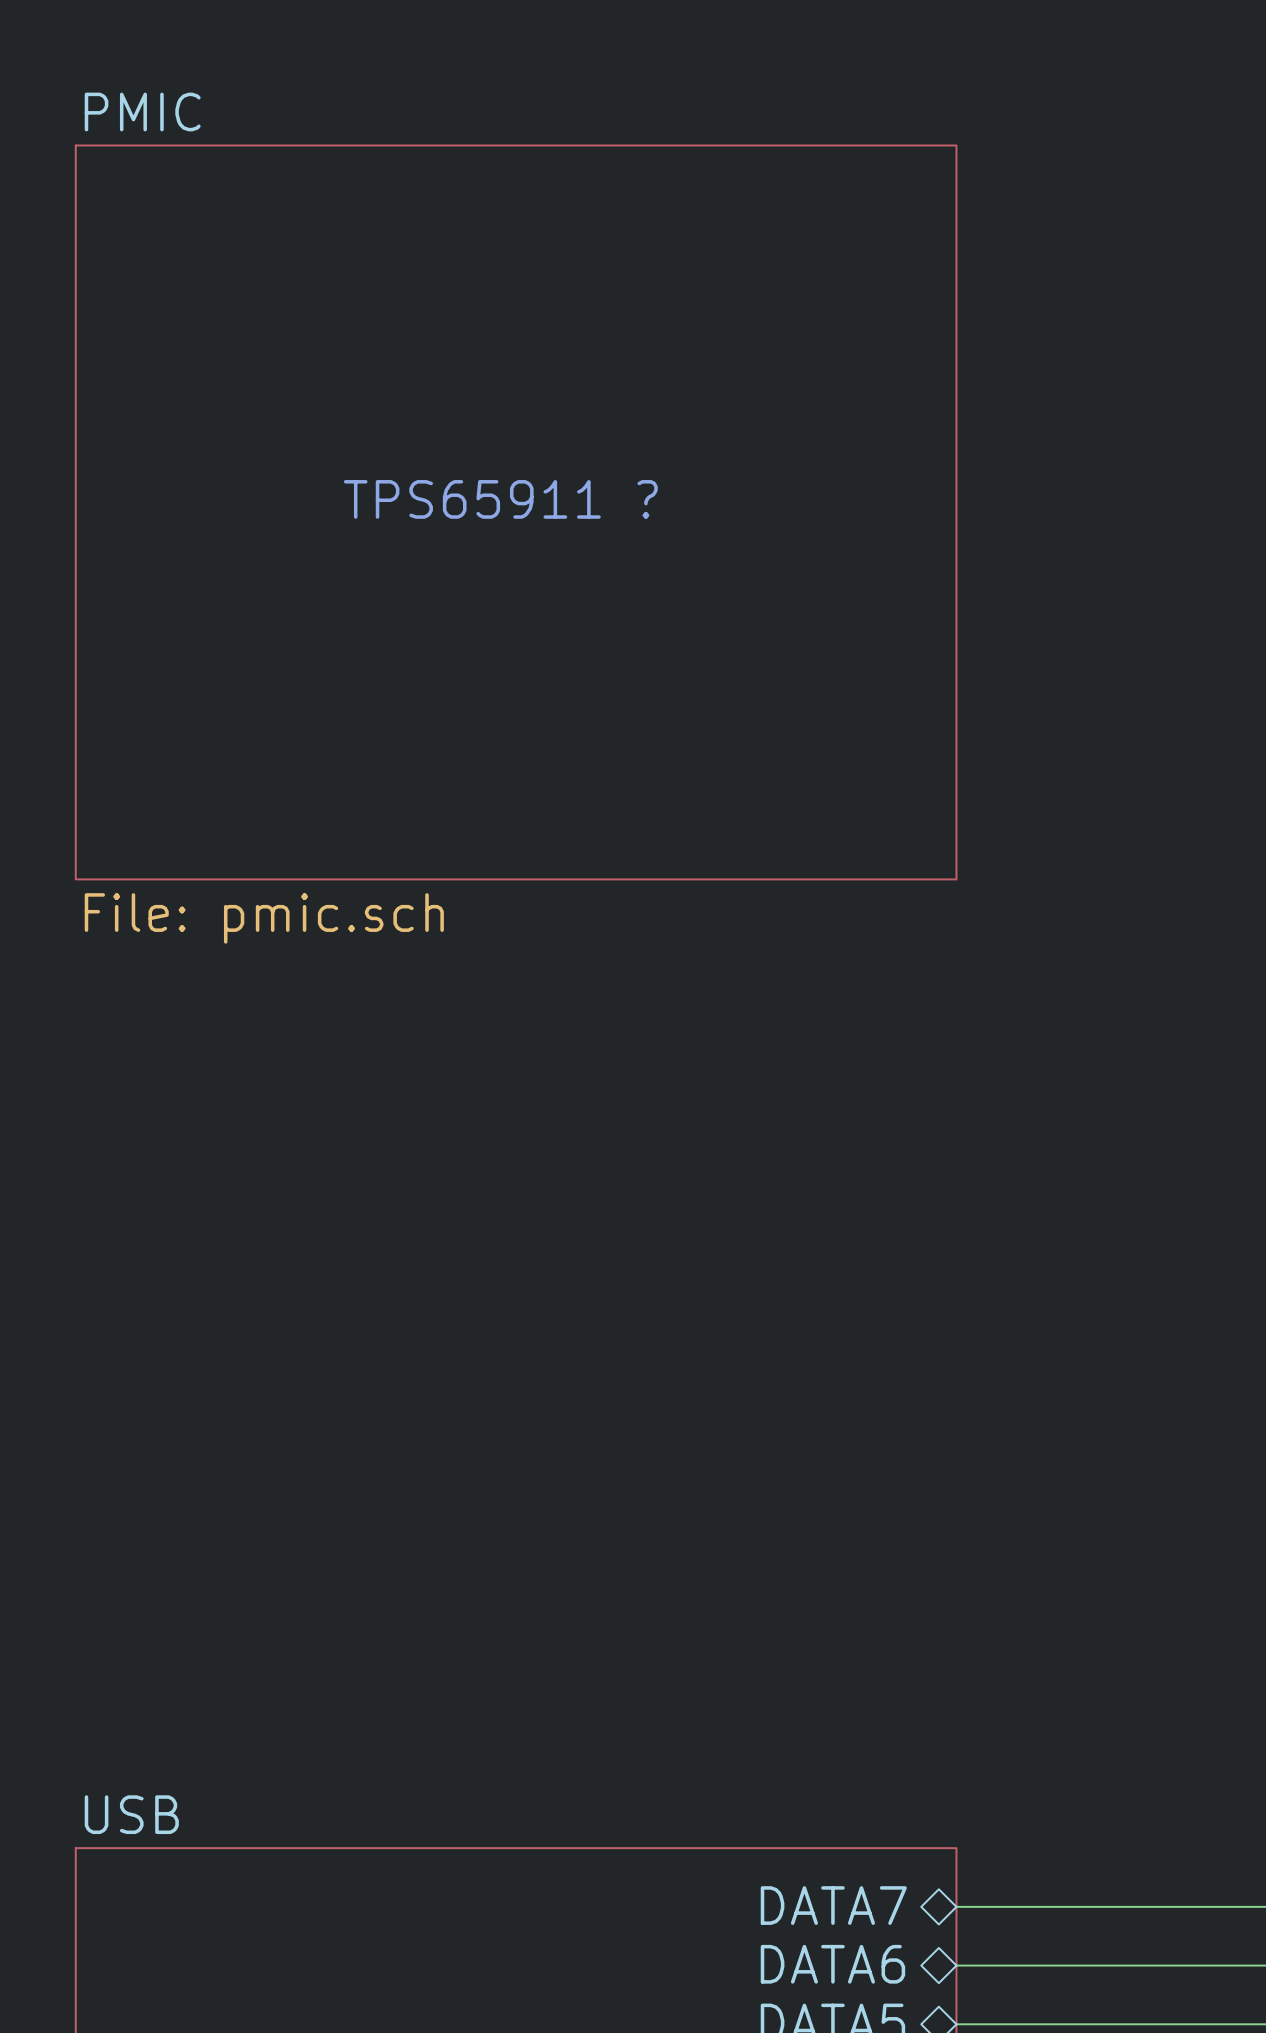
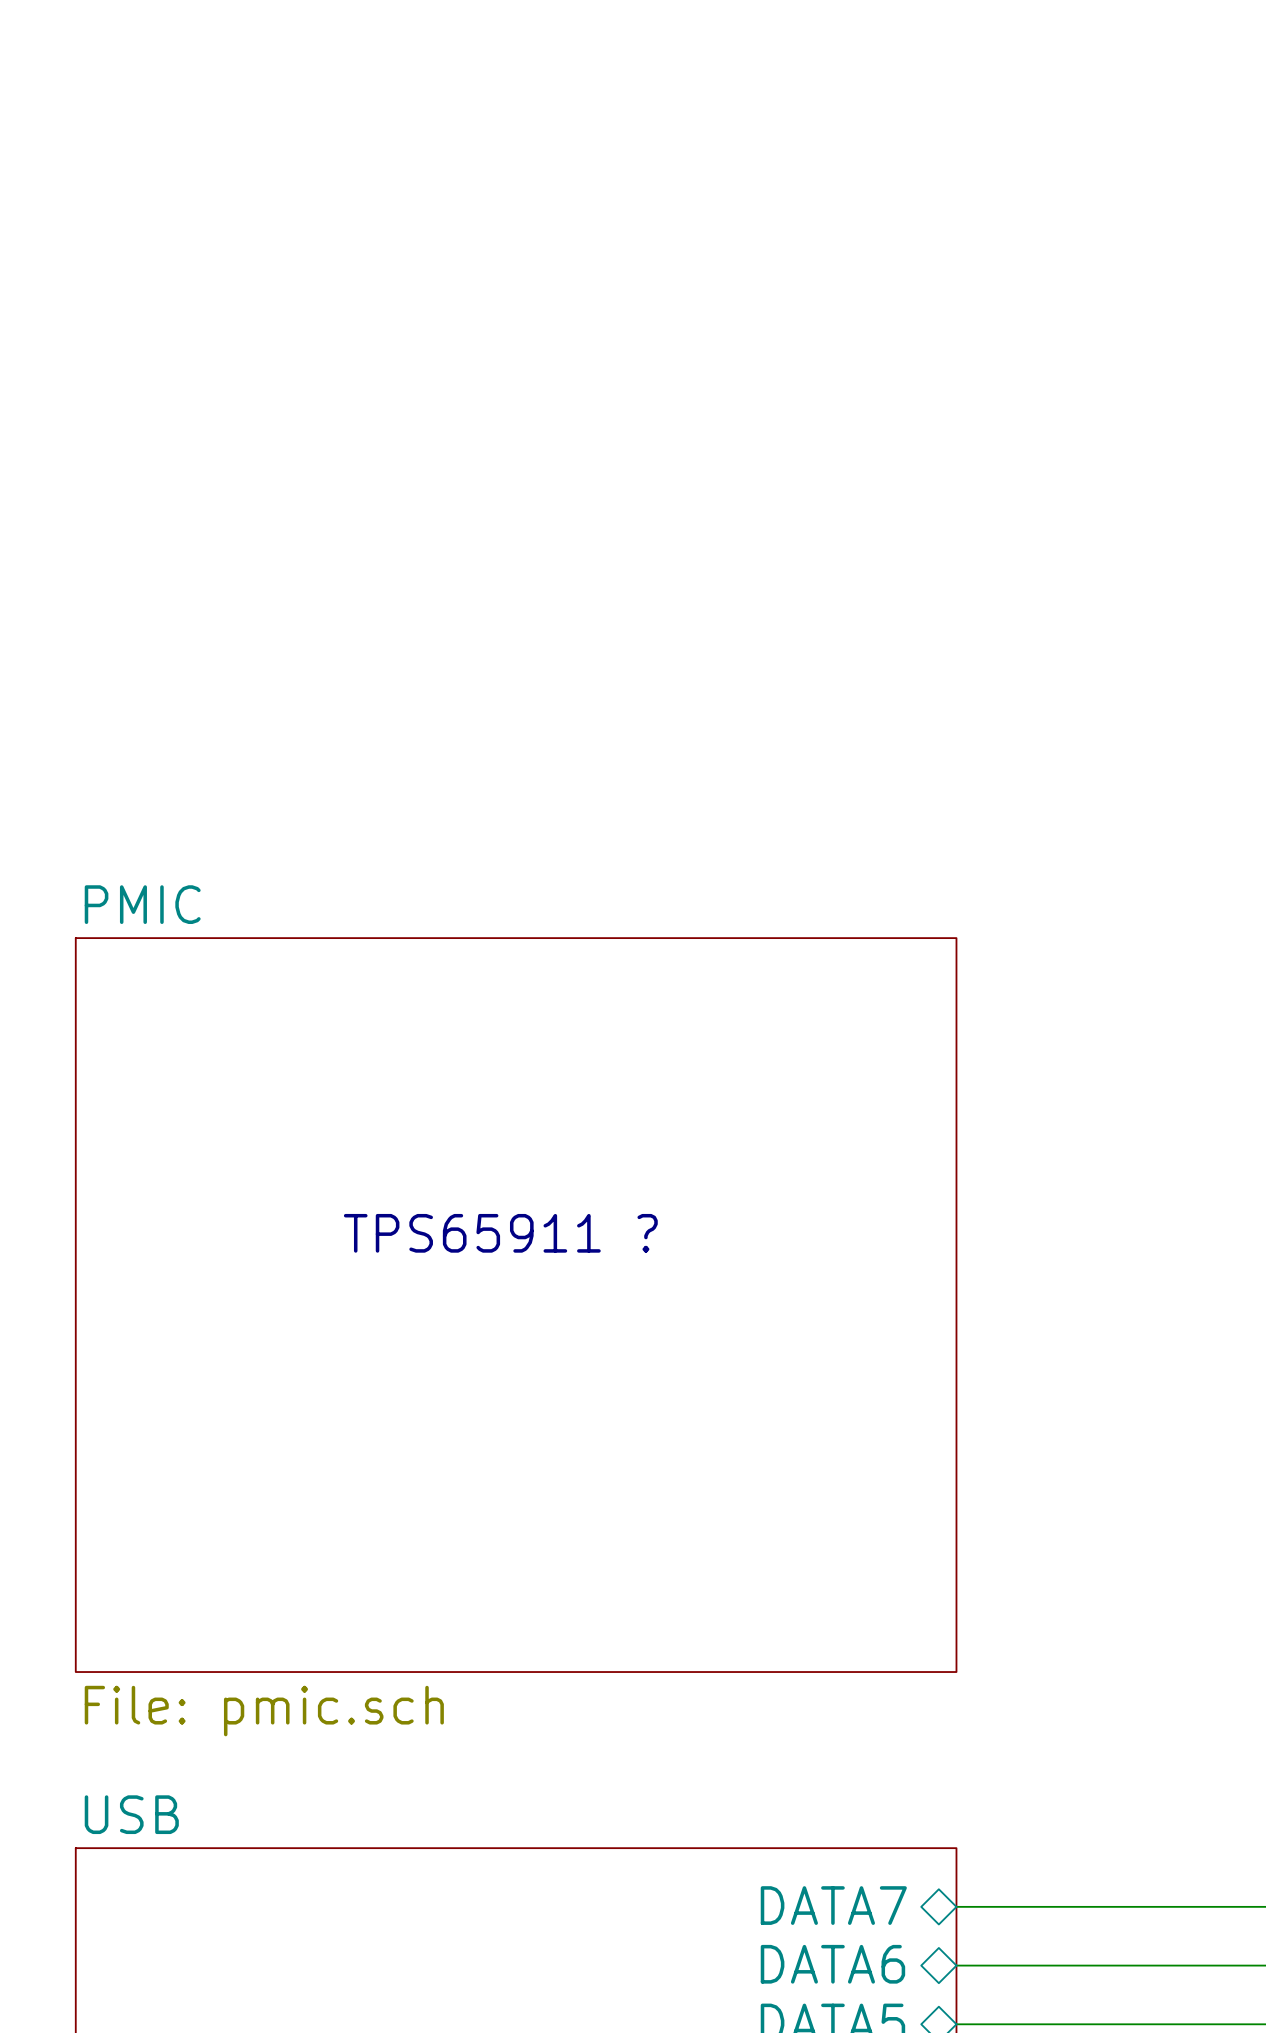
text: TPS65911 ? (500, 499) -> none
sheet PMIC: File: pmic.sch (516, 512) -> none
text: none -> TPS65911 ? (500, 1233)
sheet PMIC: none -> File: pmic.sch (516, 1305)

